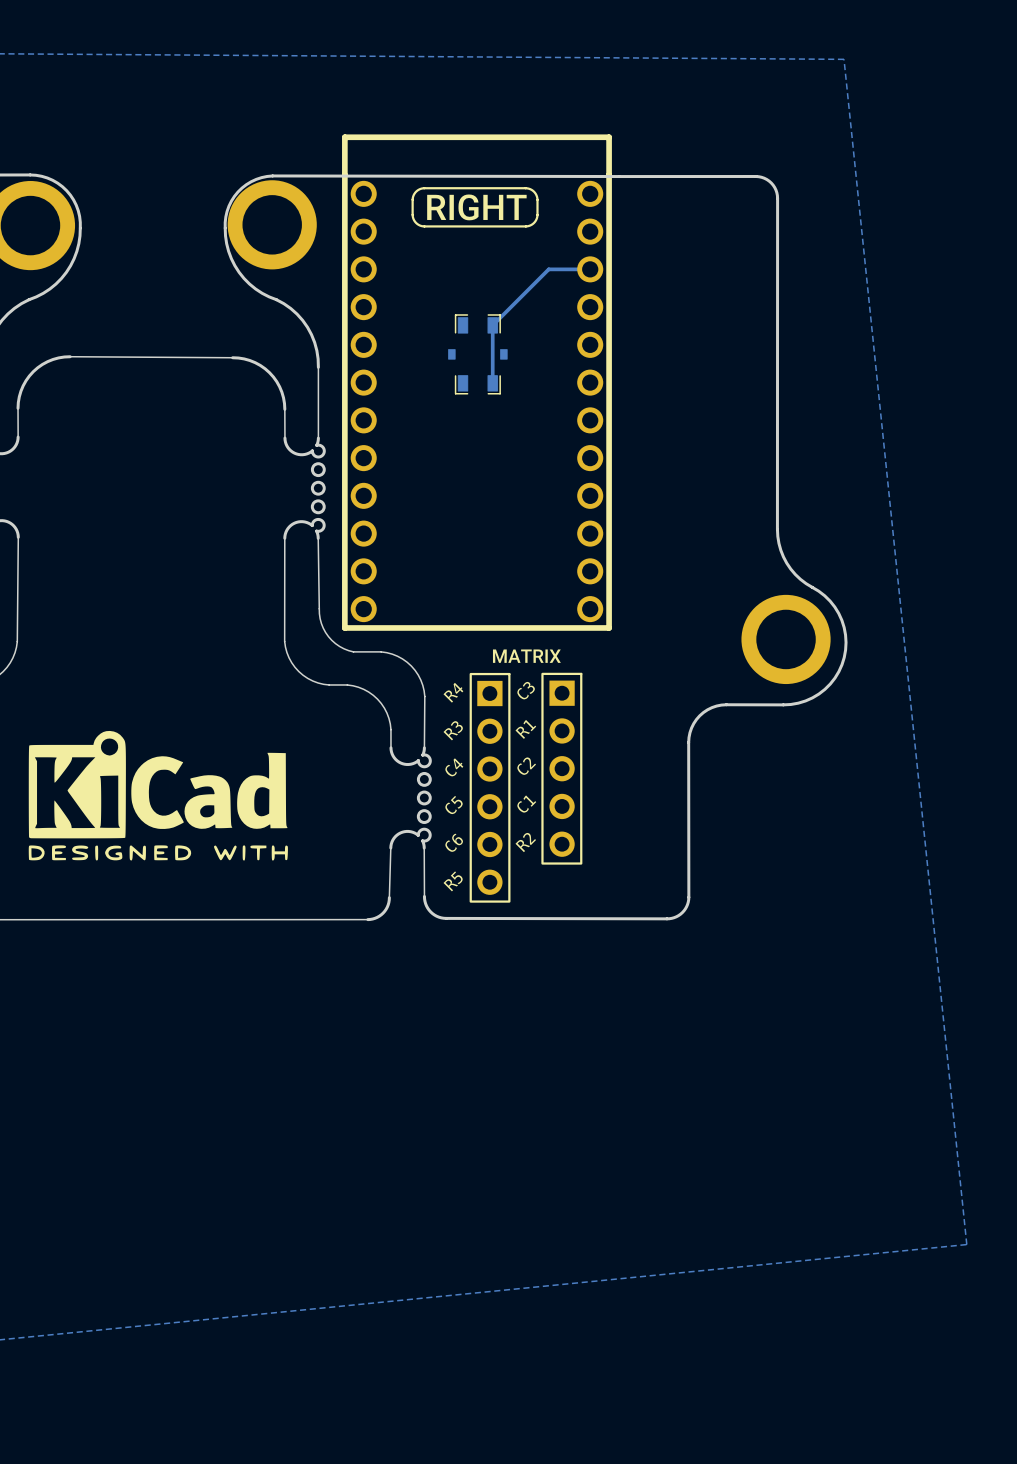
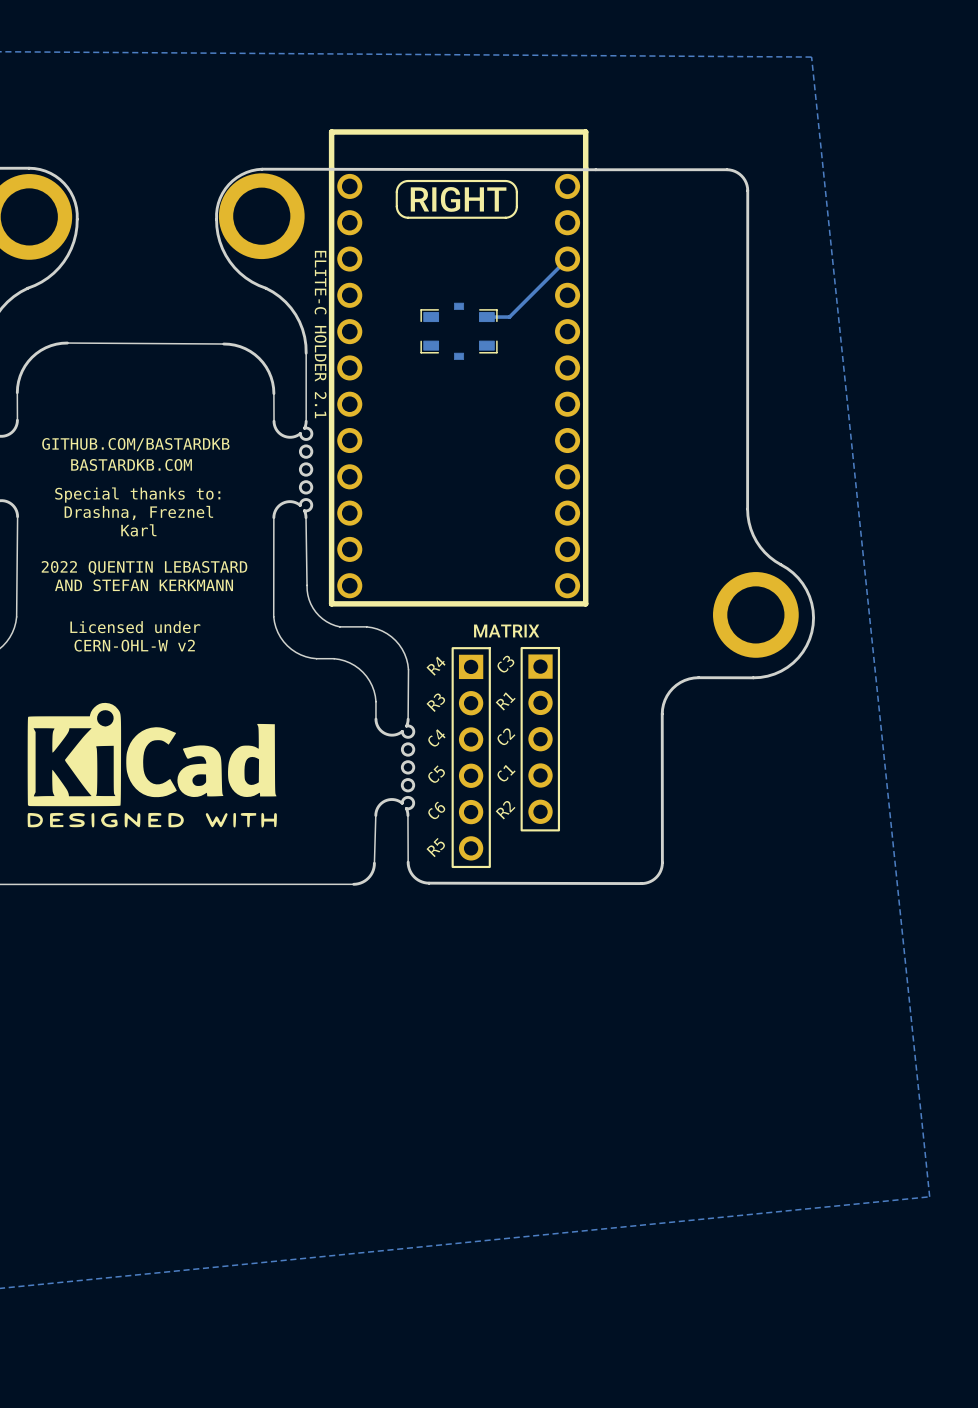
track: (590, 269) (548, 269) (492, 325) (492, 383) -> (567, 259) (509, 317) (486, 317)
text: none -> ELITE-C HOLDER 2.1 (320, 334)
part rotation: 0° (477, 354) -> 90° counterclockwise (459, 331)
text: none -> GITHUB.COM/BASTARDKB (135, 444)
text: none -> BASTARDKB.COM (131, 464)
text: none -> Special thanks to: (137, 495)
text: none -> Drashna, Freznel (138, 512)
text: none -> Karl (138, 530)
text: none -> 2022 QUENTIN LEBASTARD (144, 567)
text: none -> AND STEFAN KERKMANN (144, 585)
text: none -> Licensed under (135, 627)
text: none -> CERN-OHL-W v2 (134, 645)

